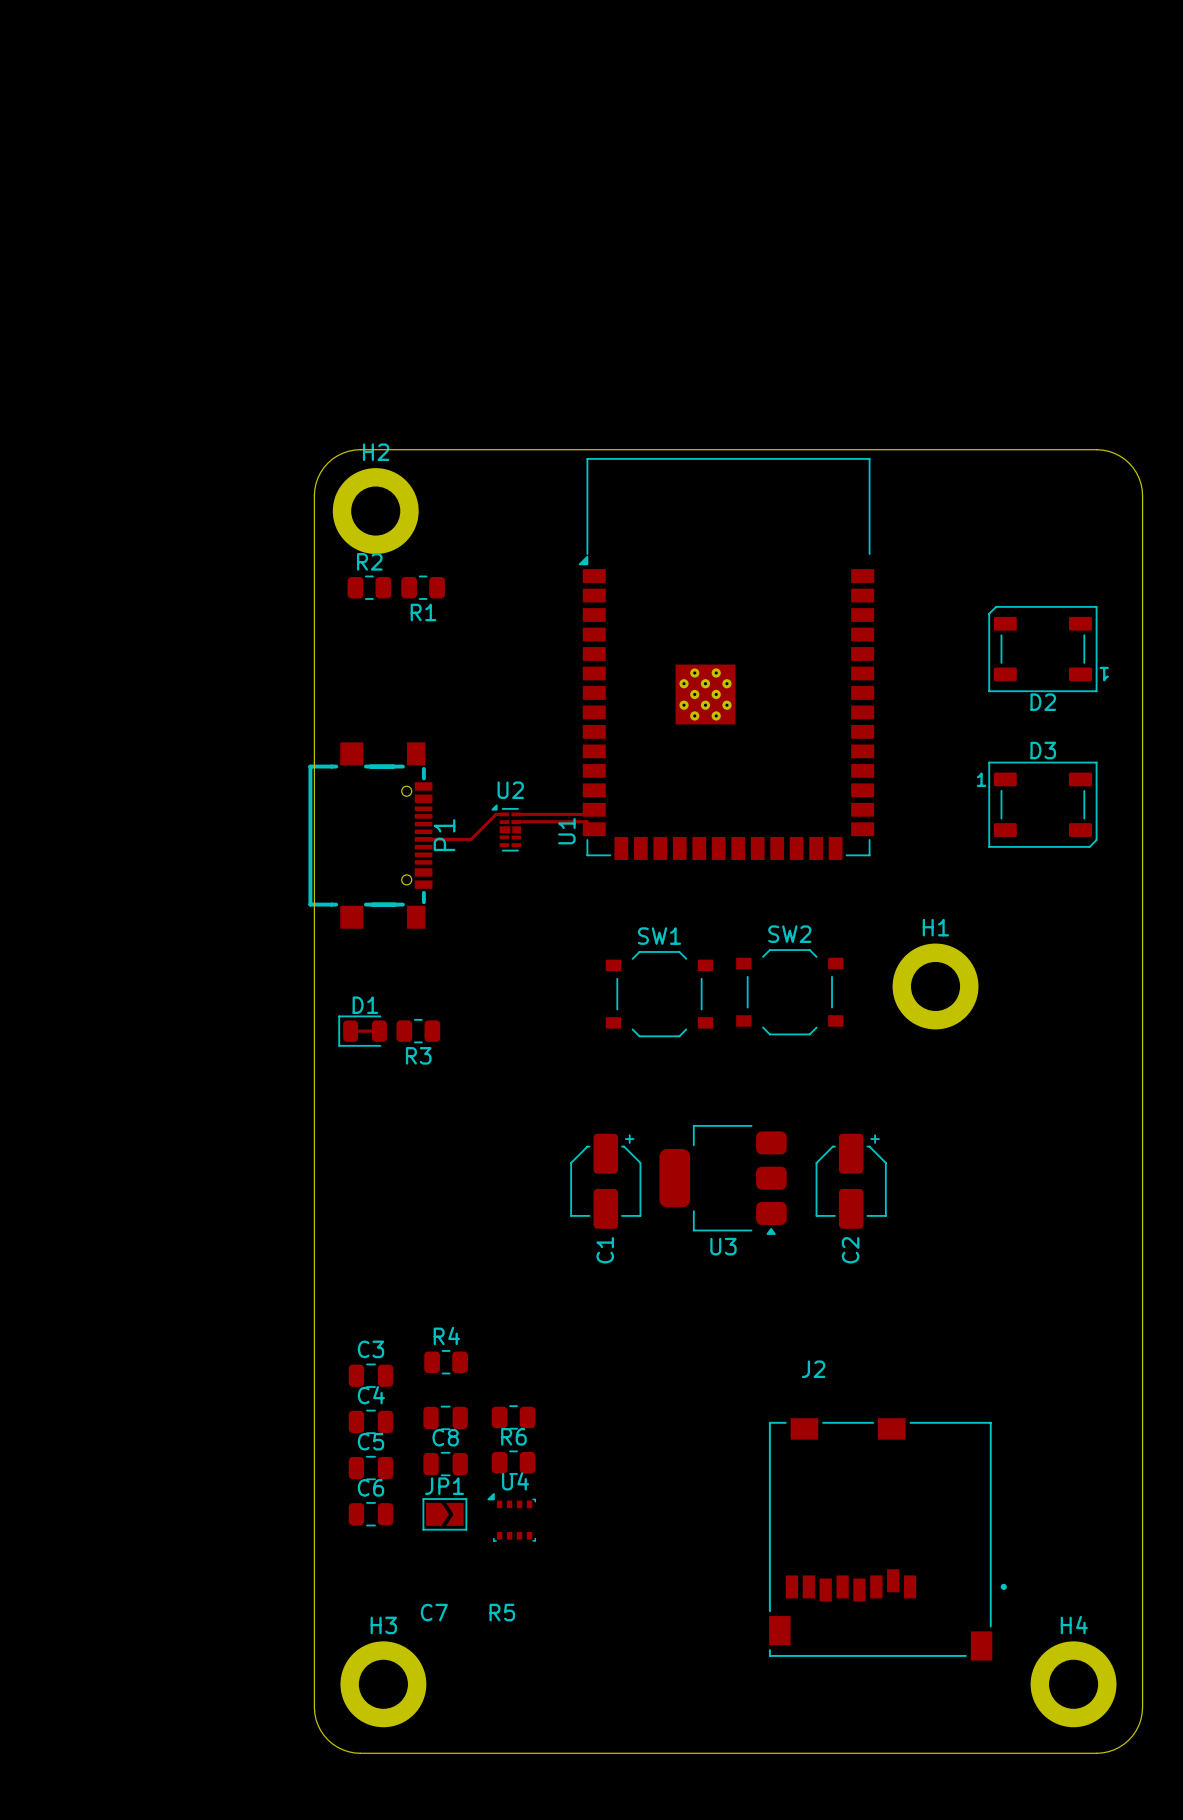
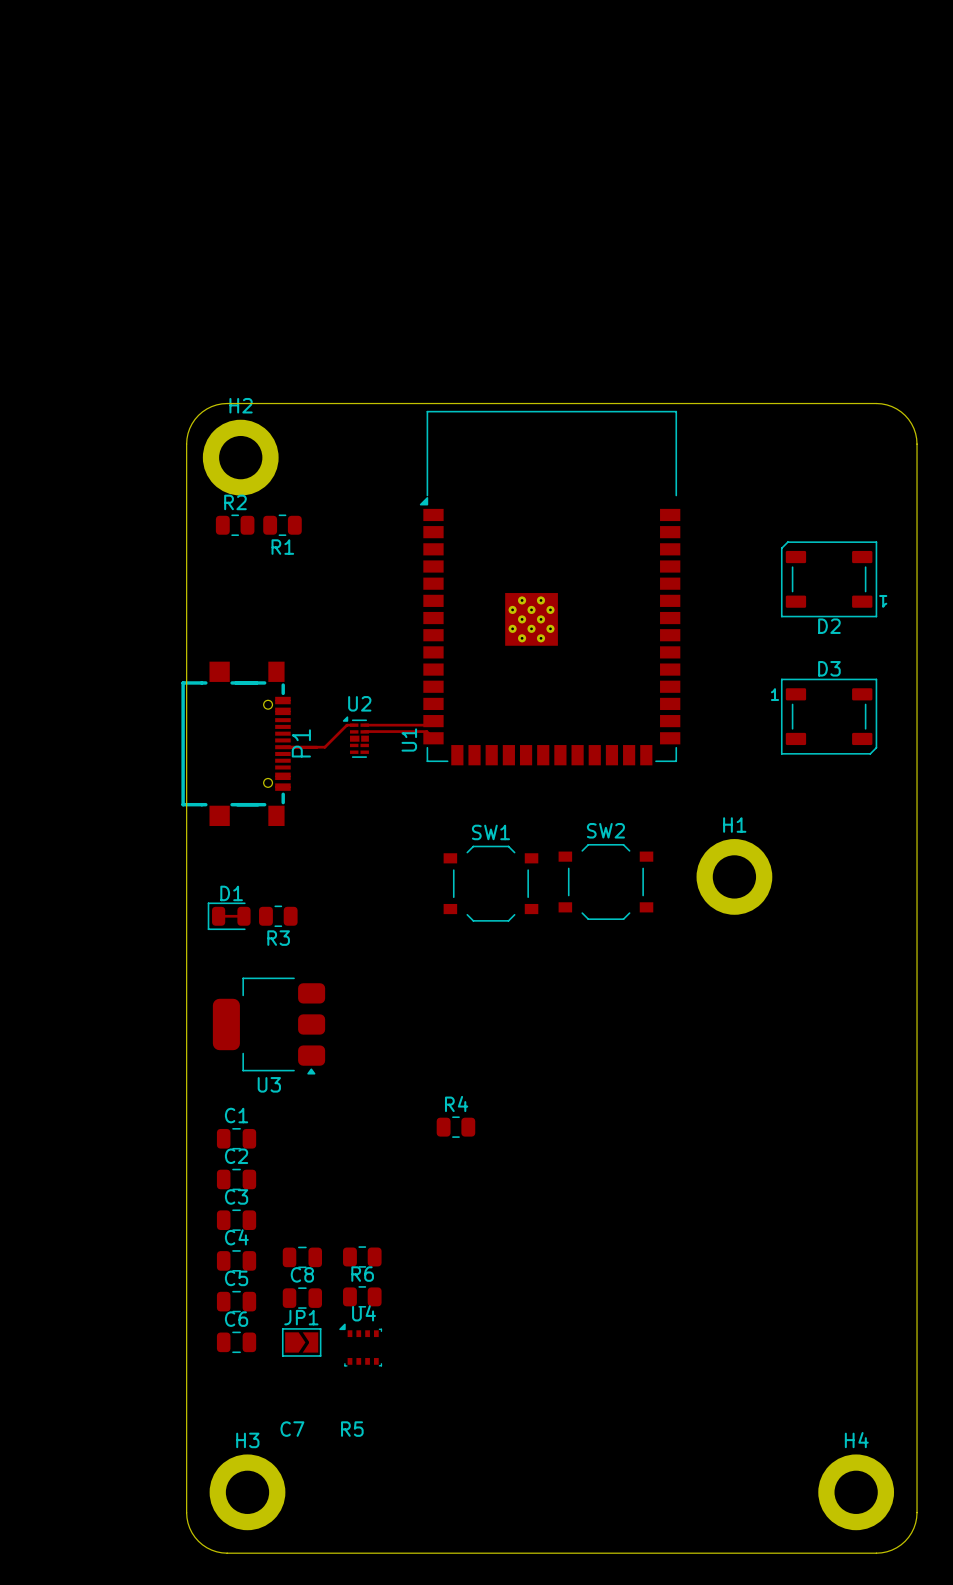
C1 footprint: [570, 1133, 642, 1229] -> [216, 1128, 257, 1150]
C2 footprint: [815, 1133, 887, 1229] -> [216, 1168, 257, 1191]
U3 position: (723, 1179) -> (269, 1026)
C1 name position: C1 (605, 1250) -> C1 (236, 1115)
C2 name position: C2 (850, 1250) -> C2 (236, 1156)
R4 position: (446, 1362) -> (455, 1127)
J2: (887, 1539) -> none

